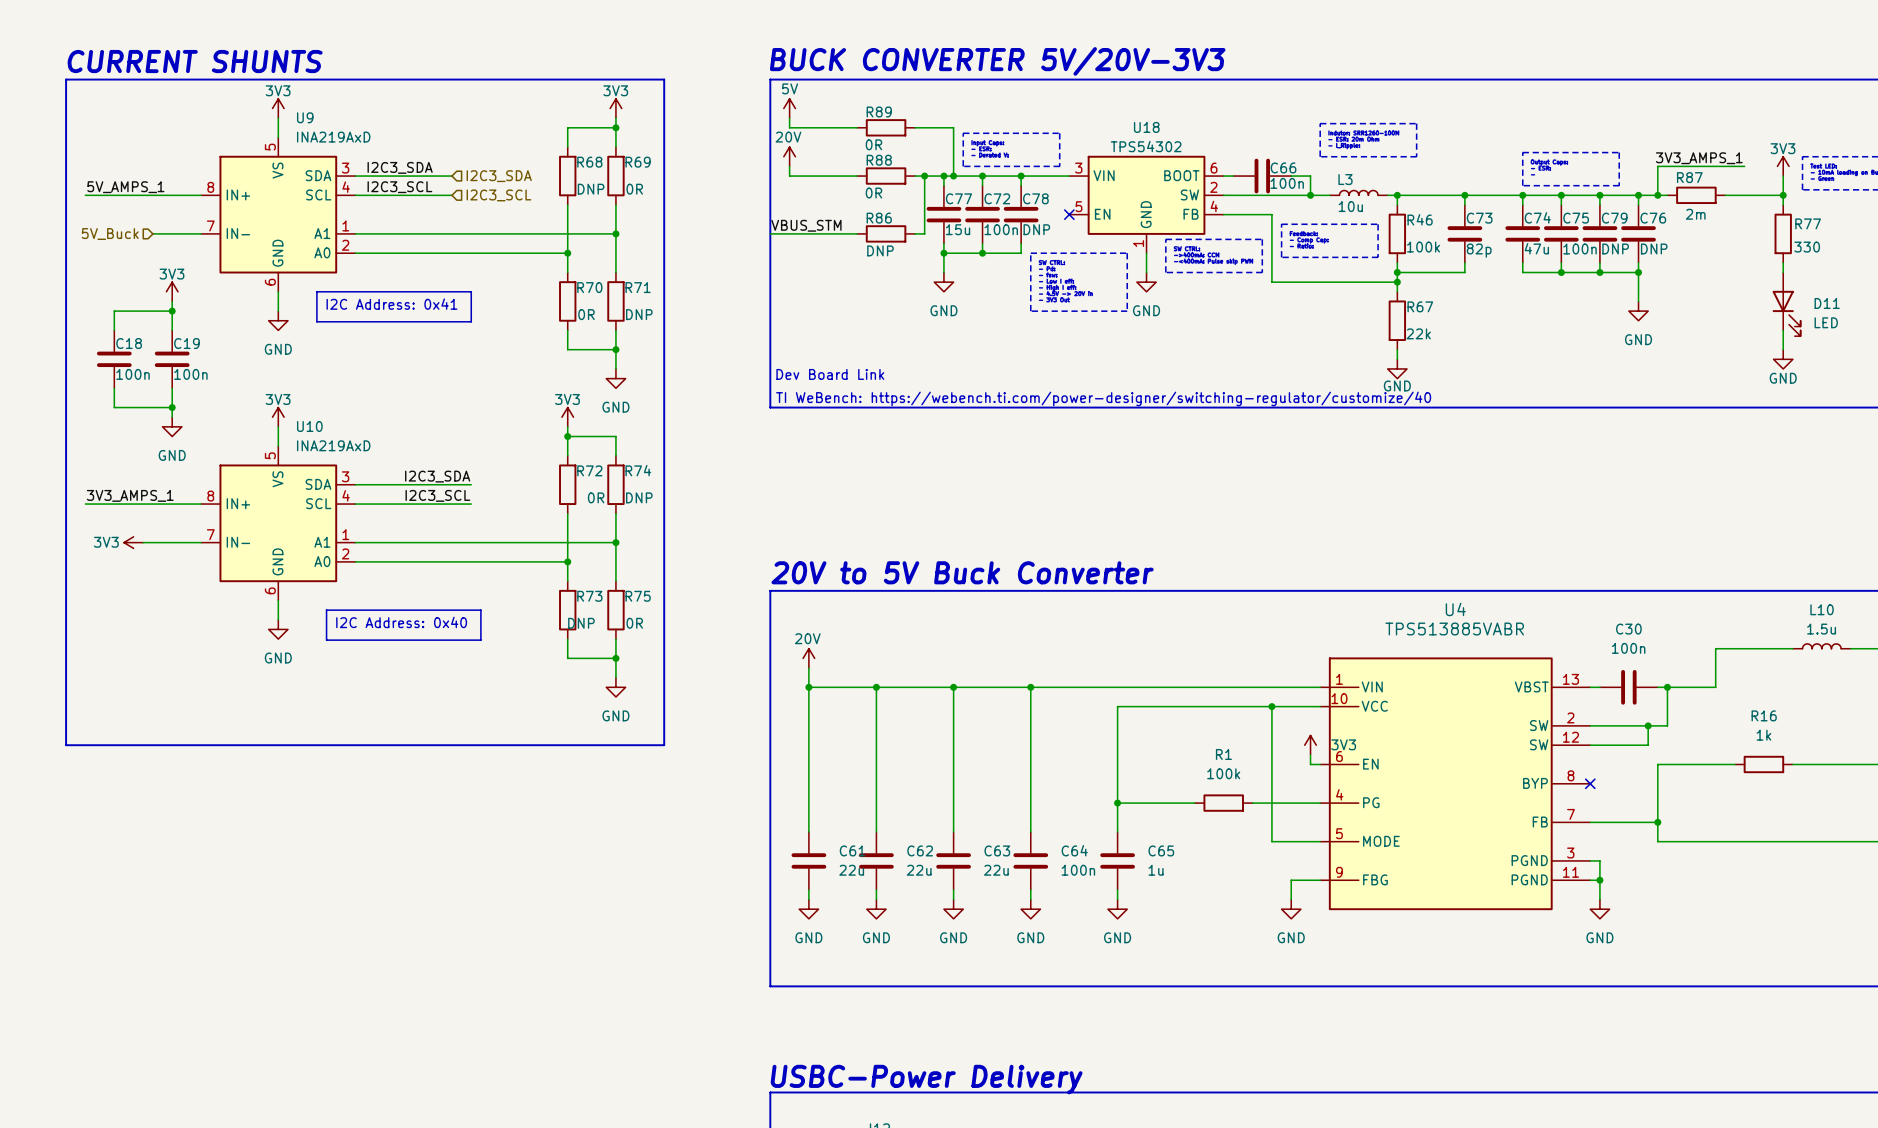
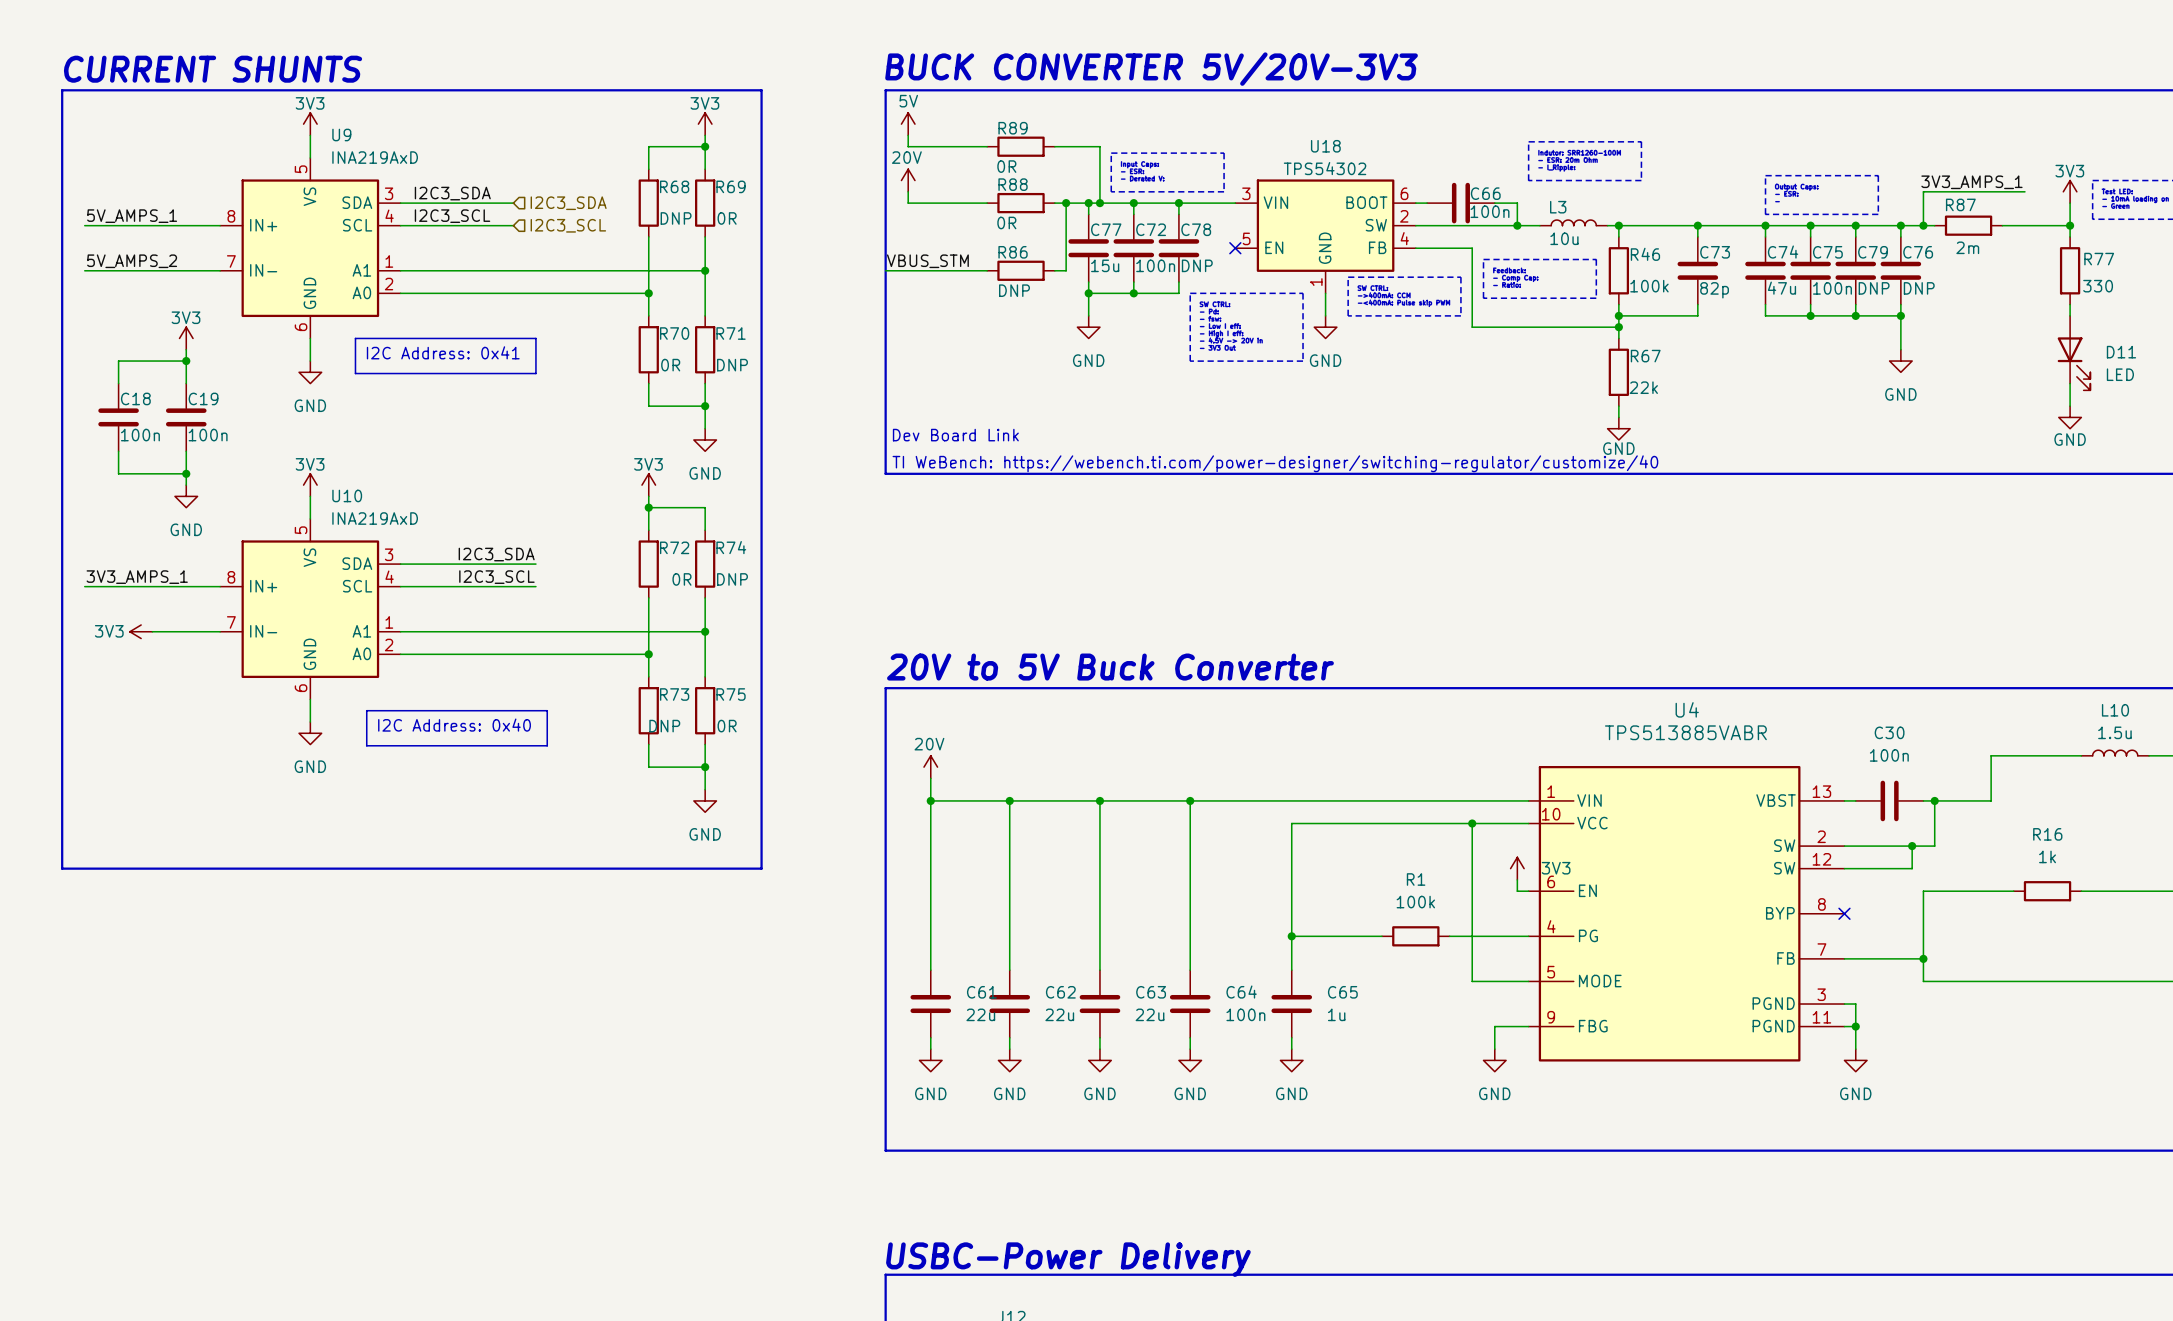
label: none -> 5V_AMPS_2 (132, 261)
wire: none -> (84, 270) (163, 270)
hierarchical label: 5V_Buck (110, 234) -> none

